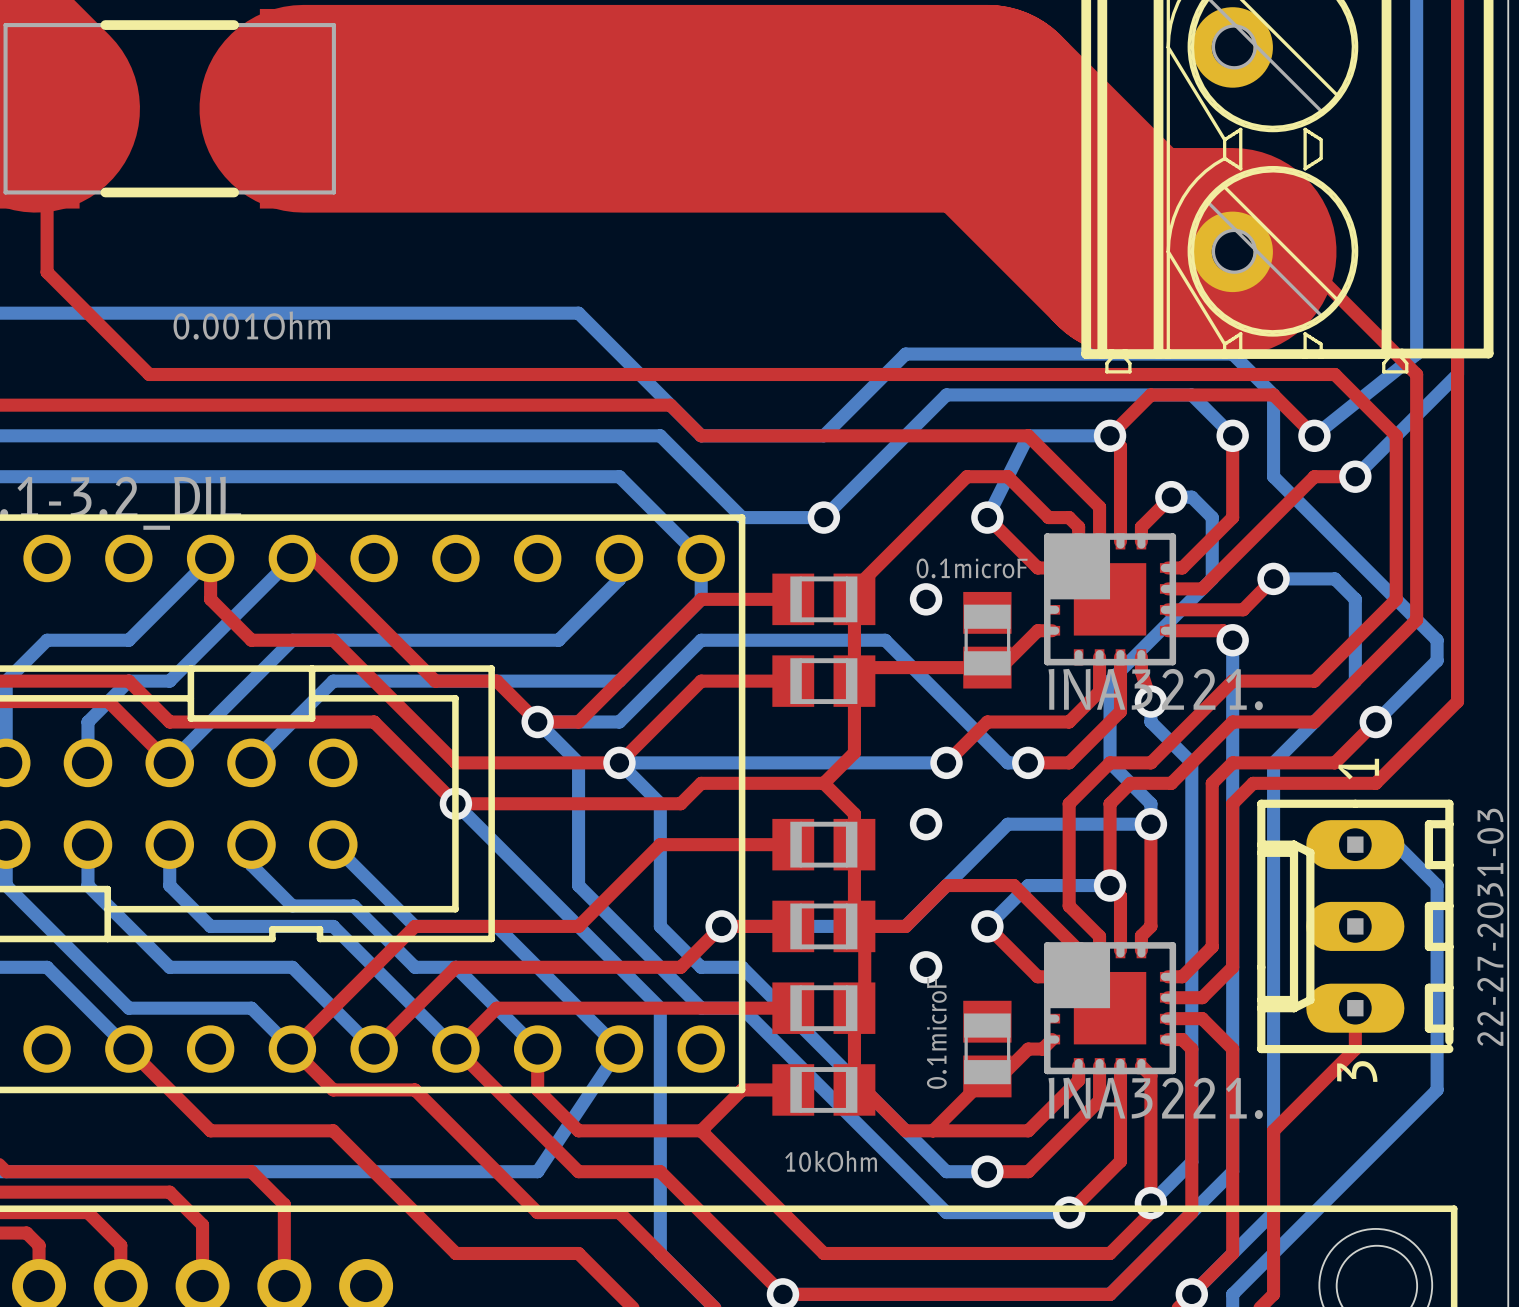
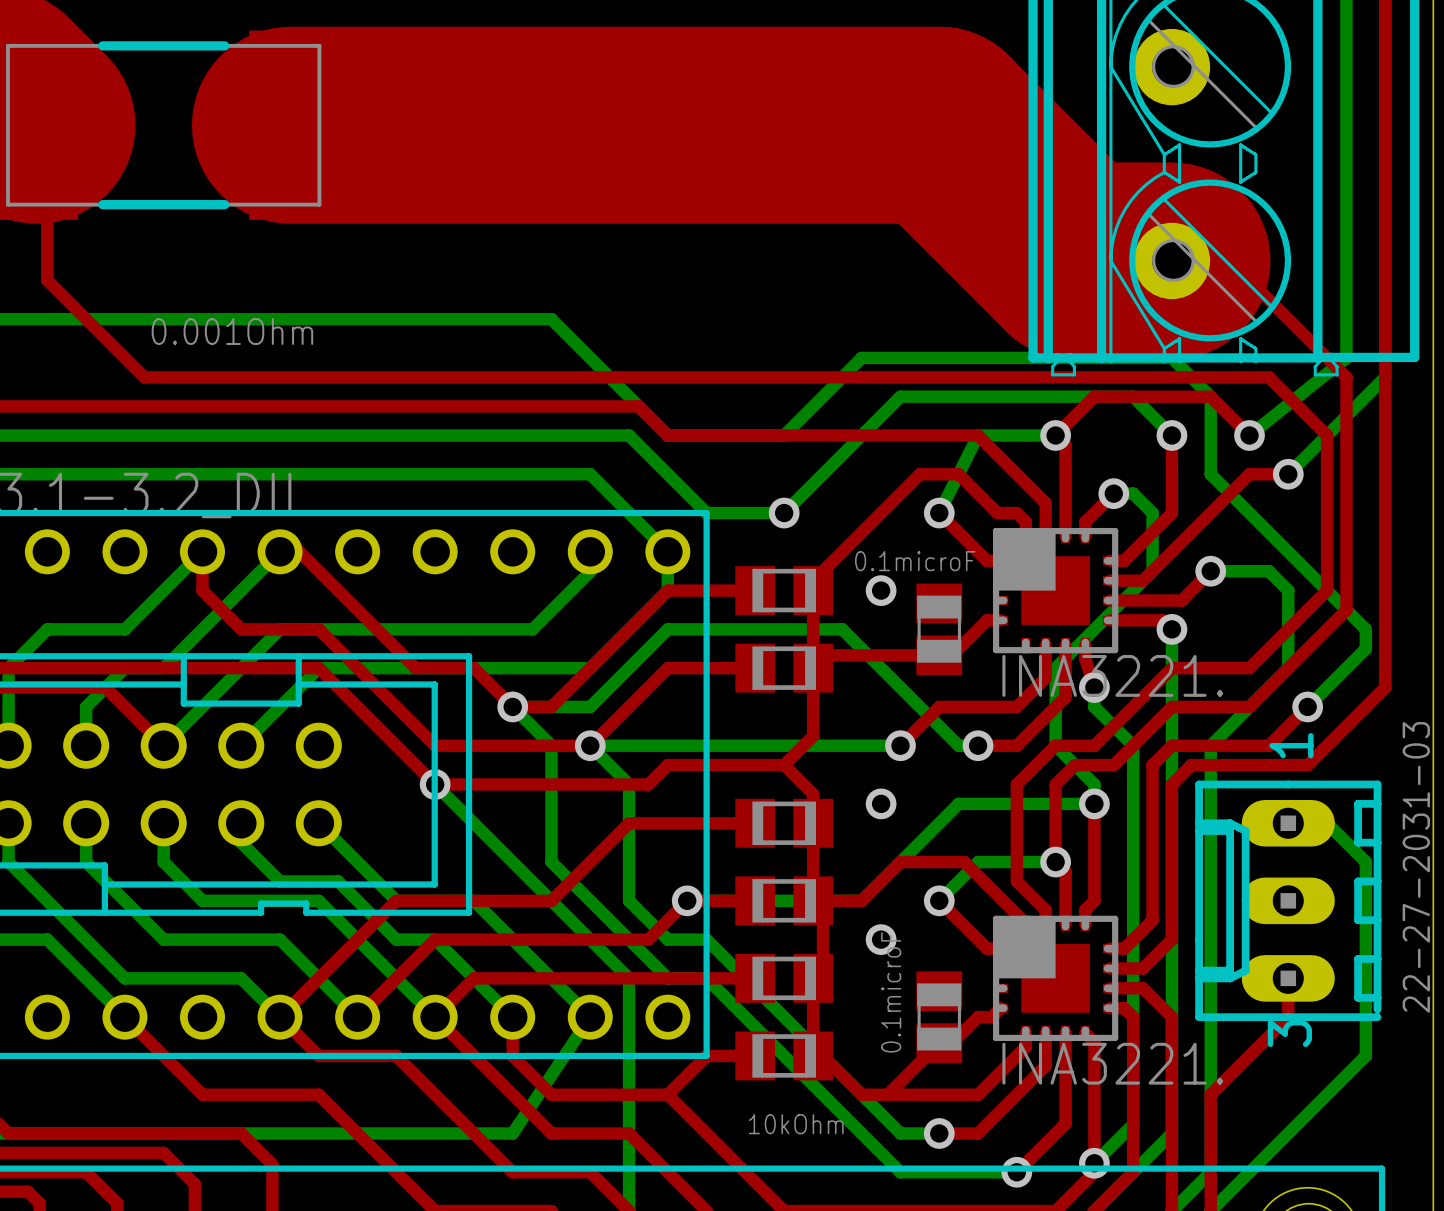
top track: (128, 681) (169, 722) (374, 722) -> (124, 668) (318, 668) (357, 706)

